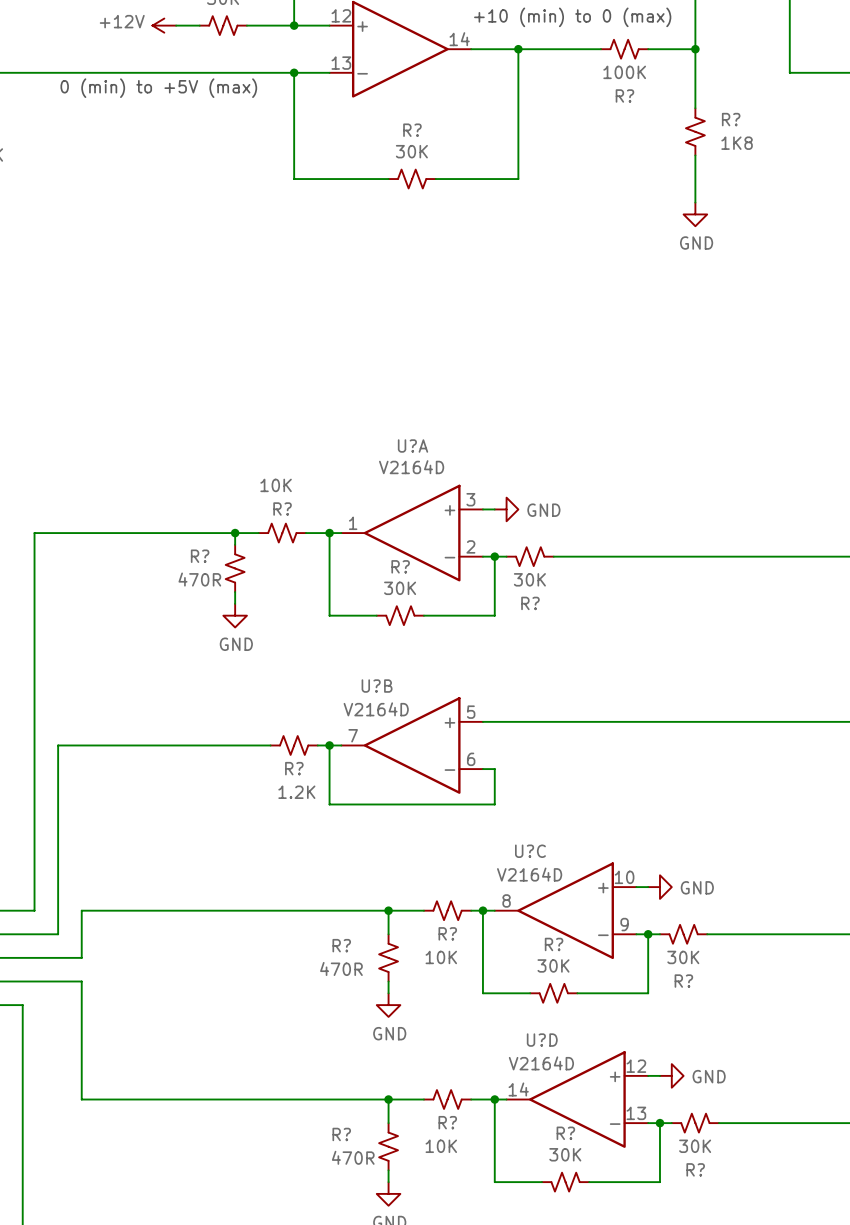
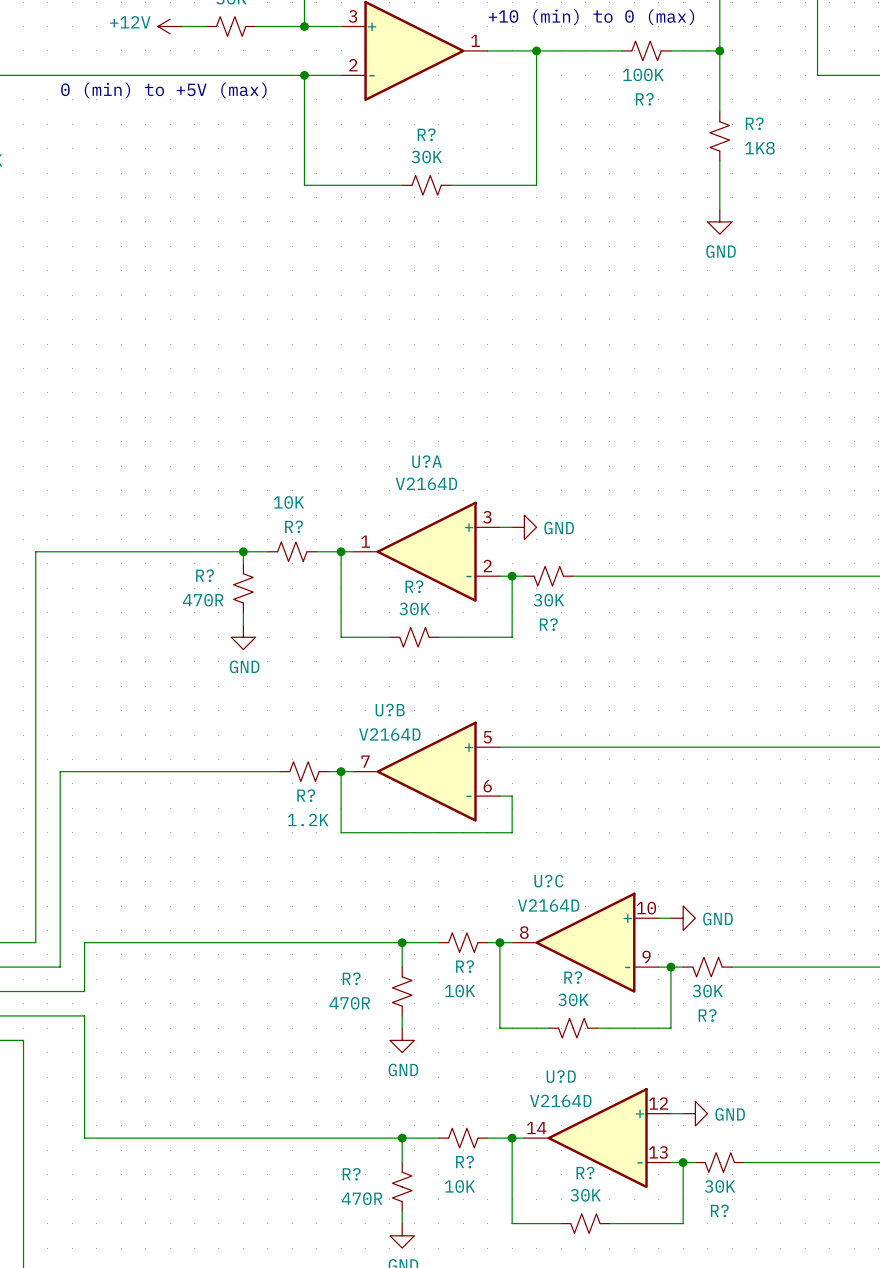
part pin number: 12 (341, 15) -> 3 (353, 16)
part pin number: 14 (459, 39) -> 1 (475, 40)
part pin number: 13 (341, 63) -> 2 (353, 65)

